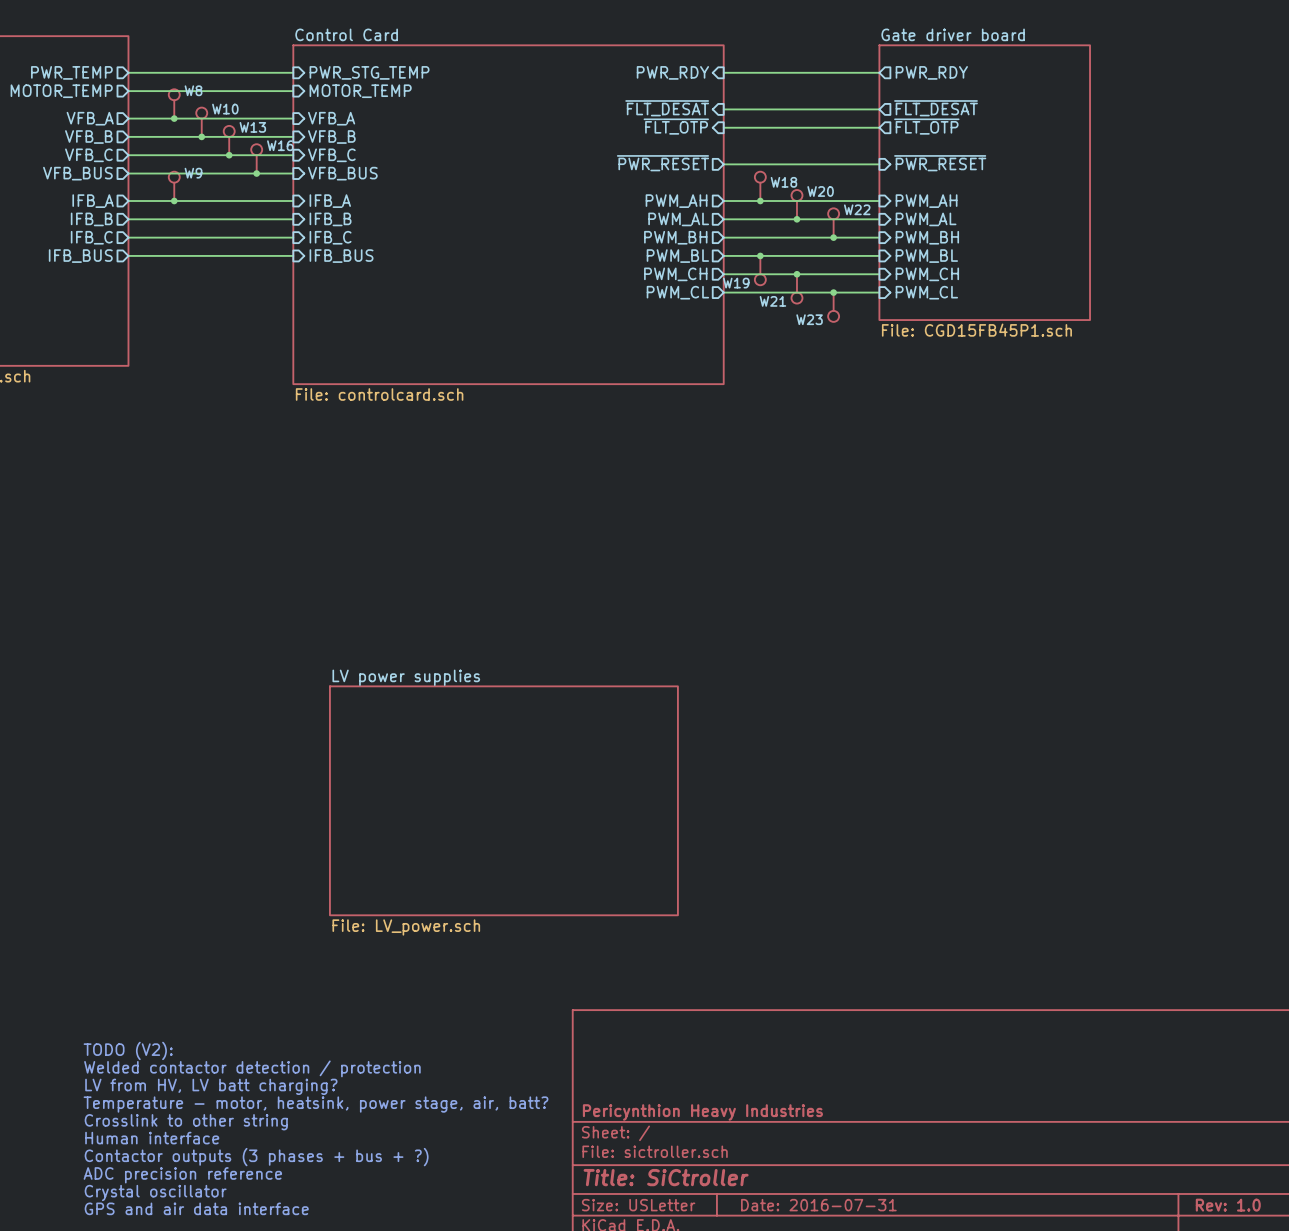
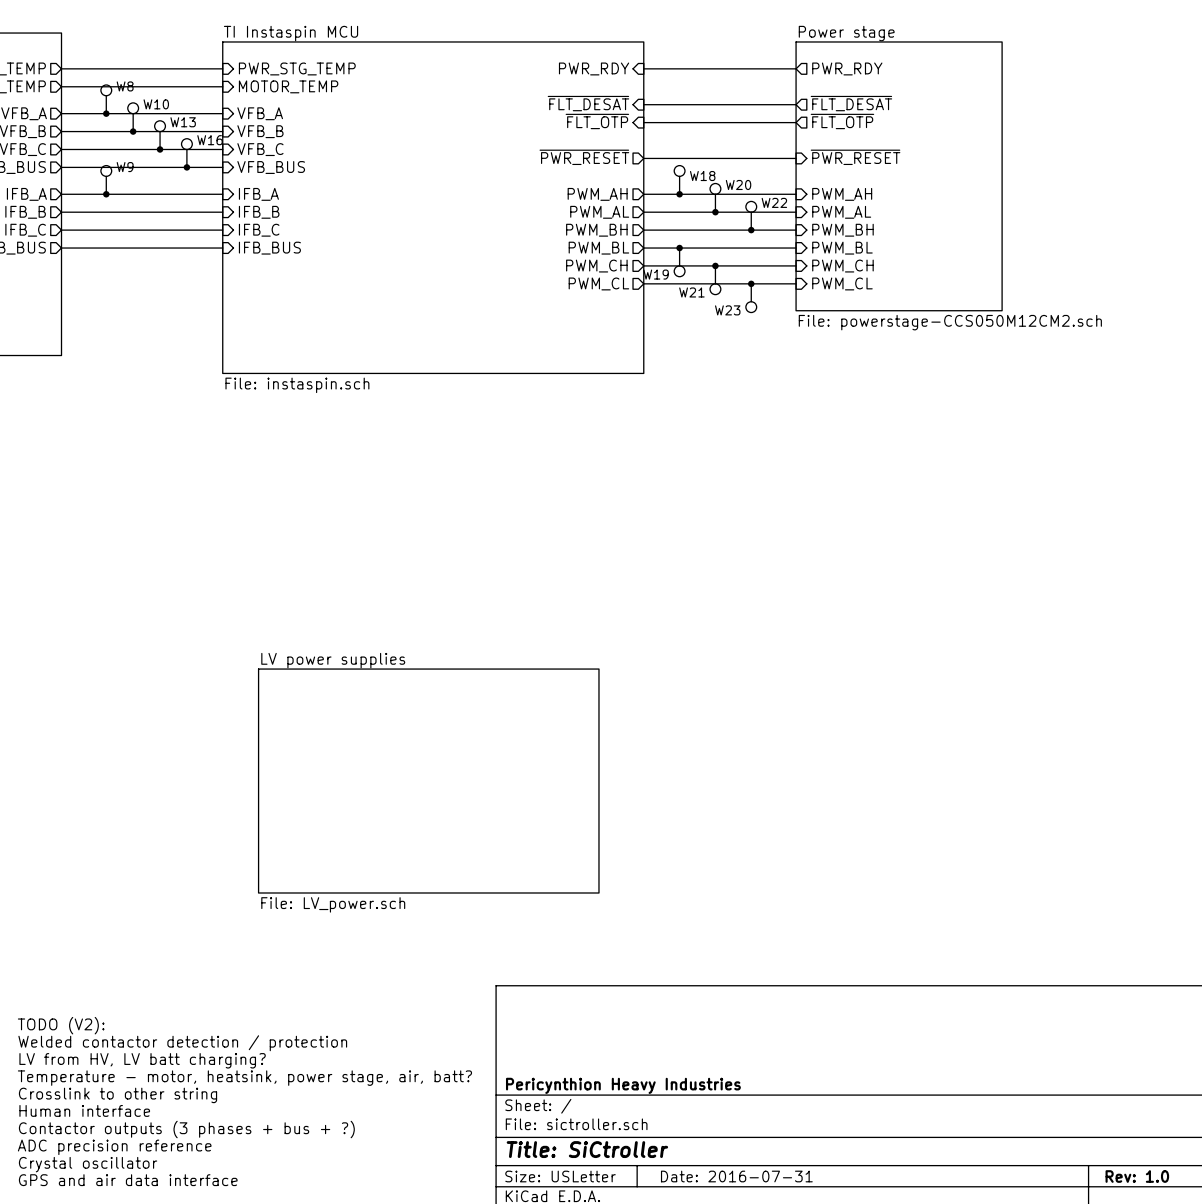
sheet Control Card name: Control Card (346, 34) -> TI Instaspin MCU (291, 33)
sheet Gate driver board name: Gate driver board (953, 34) -> Power stage (846, 33)
sheet Gate driver board value: File: CGD15FB45P1.sch (976, 330) -> File: powerstage-CCS050M12CM2.sch (950, 322)
sheet Control Card value: File: controlcard.sch (379, 394) -> File: instaspin.sch (297, 385)

